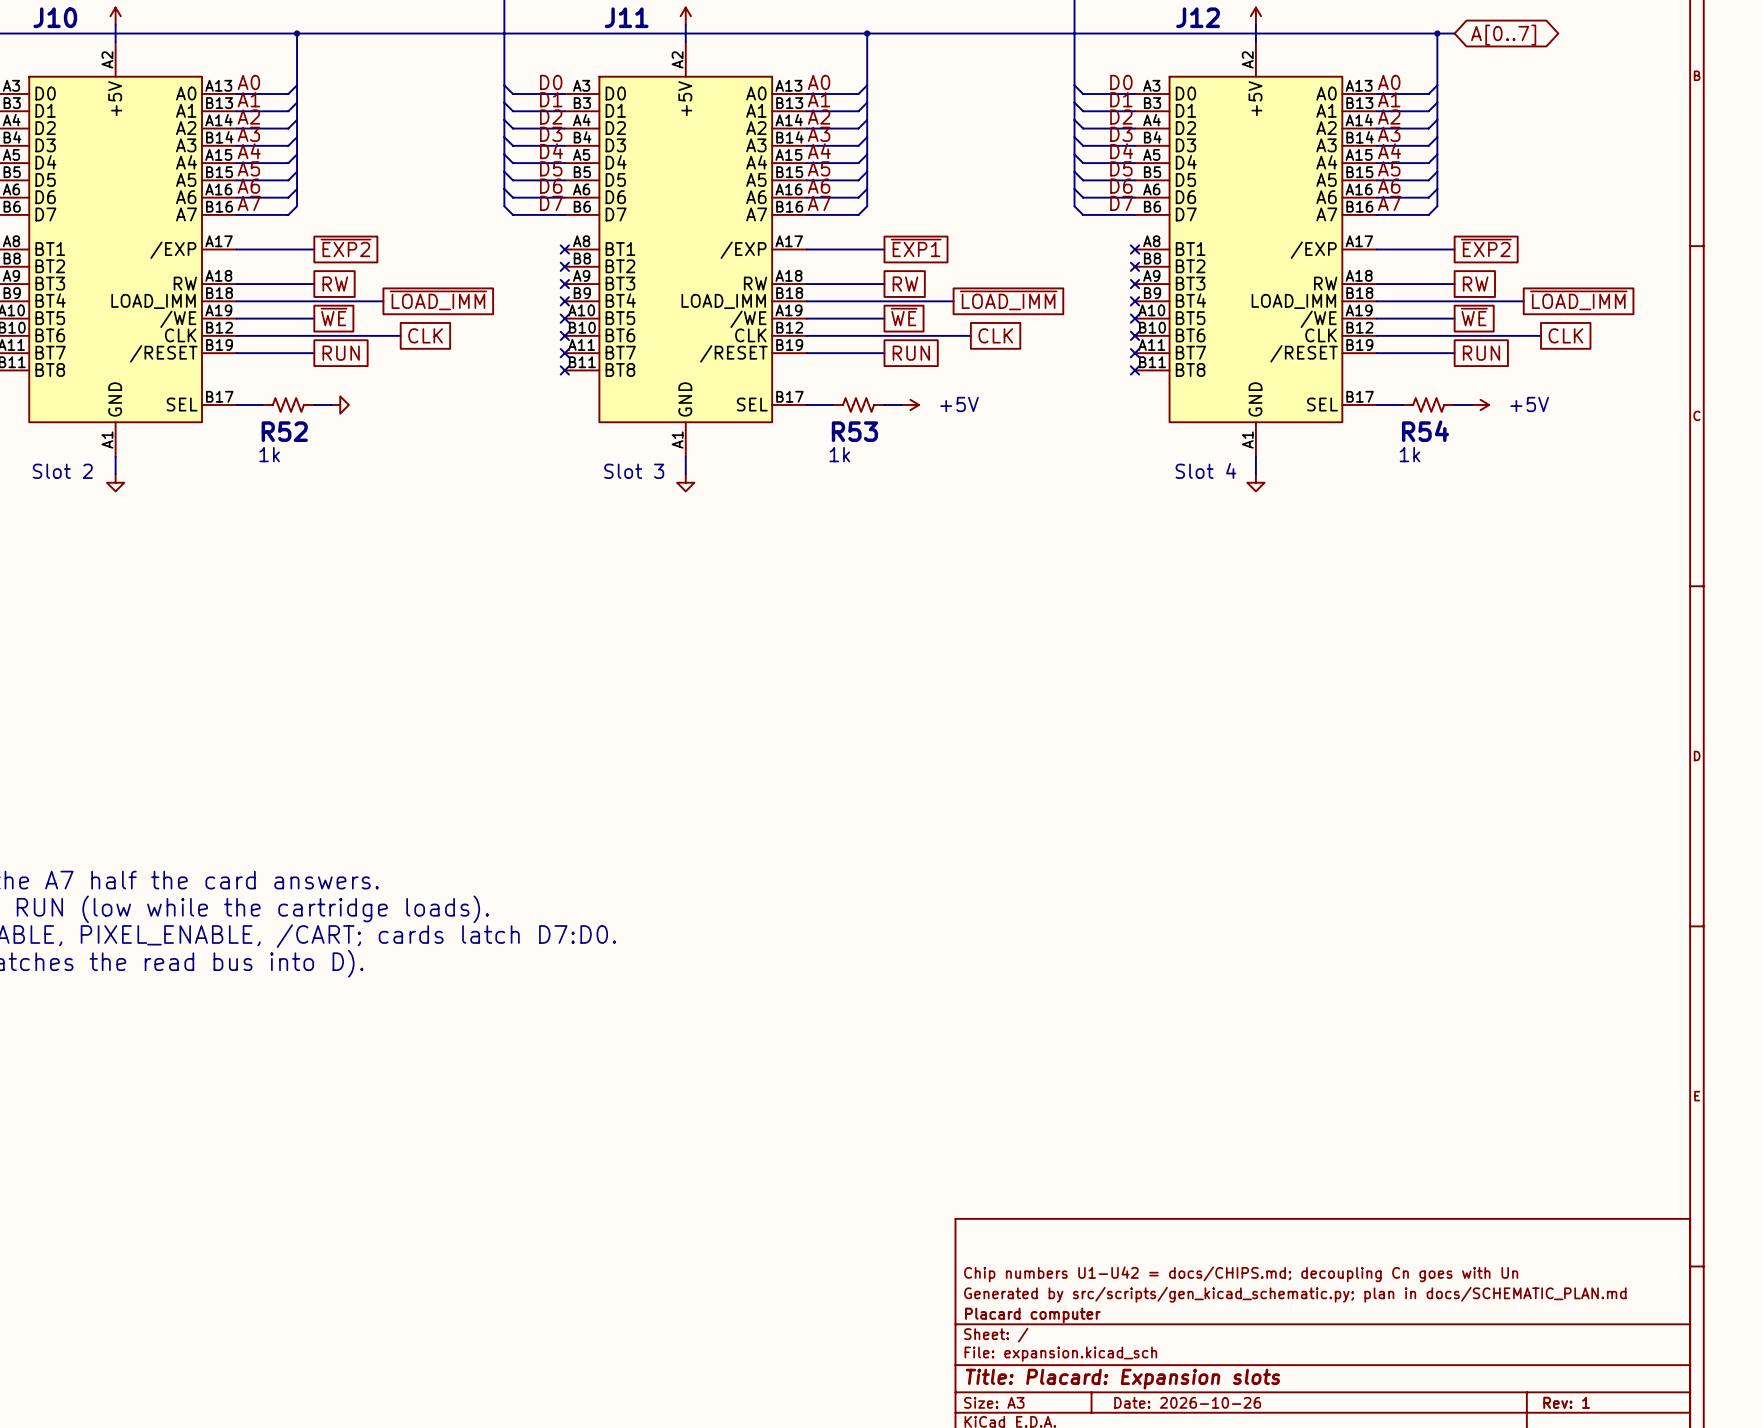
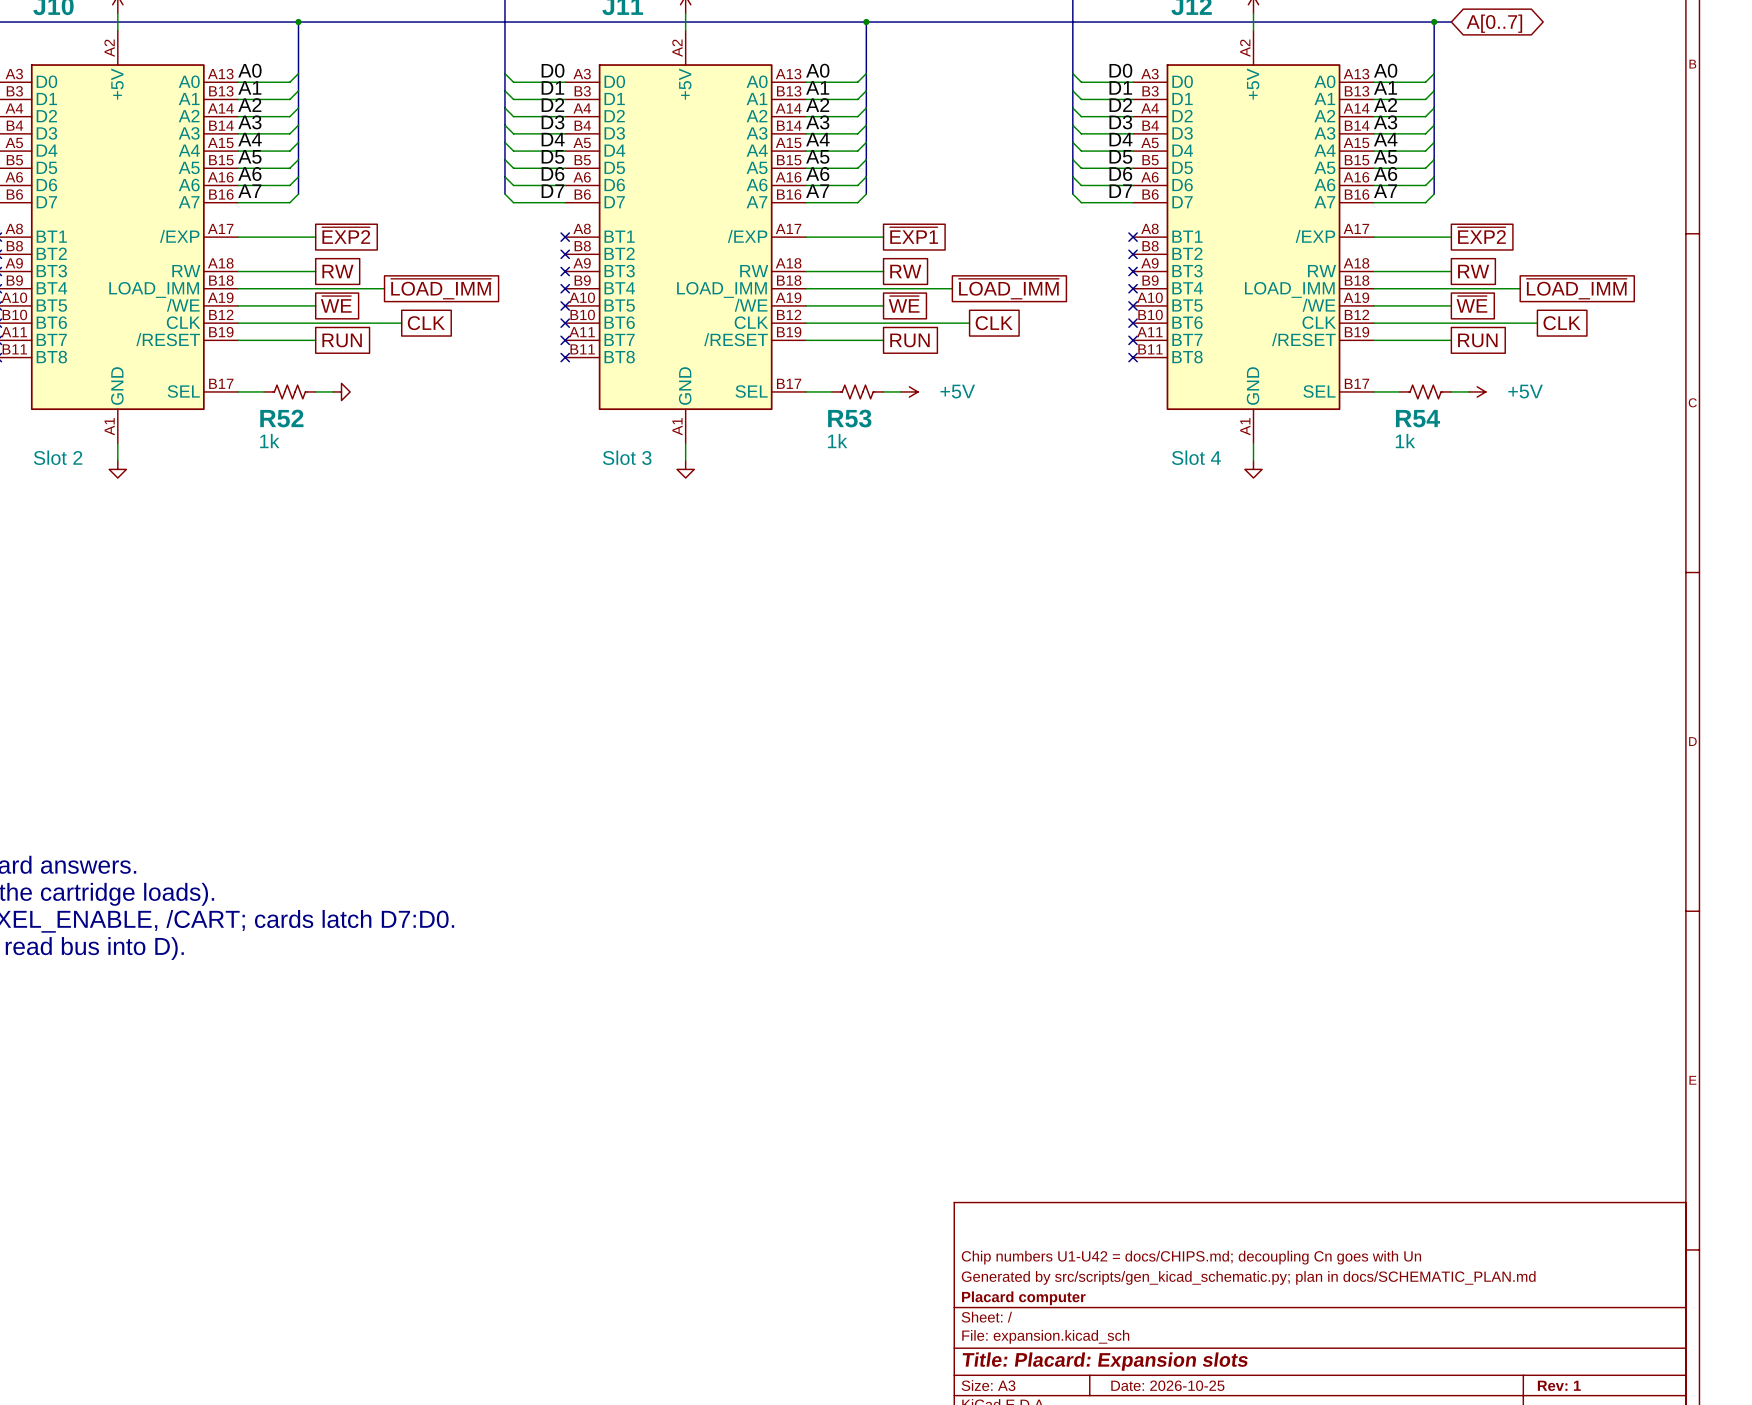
title block: Date: 2026-10-26 (1187, 1402) -> Date: 2026-10-25 (1167, 1385)

